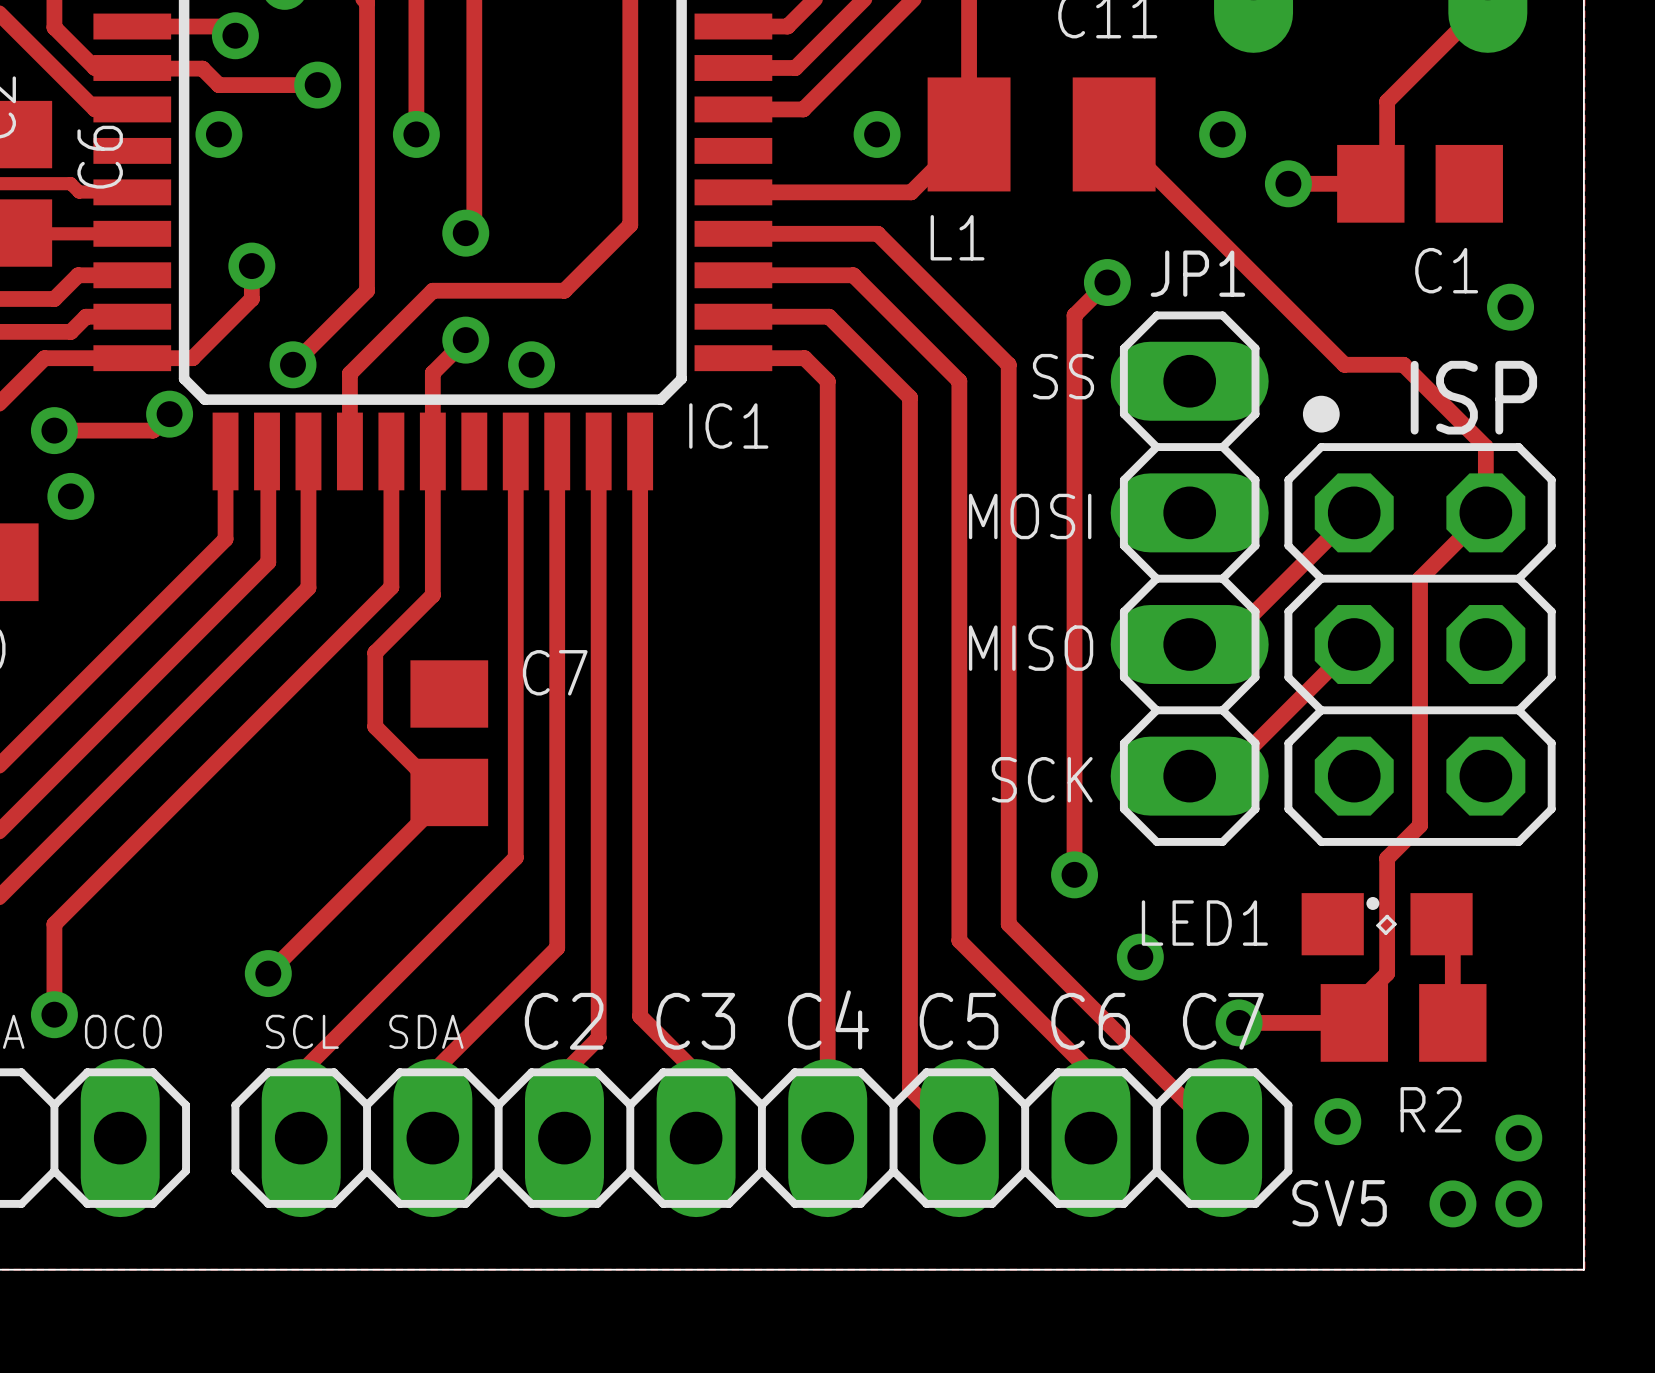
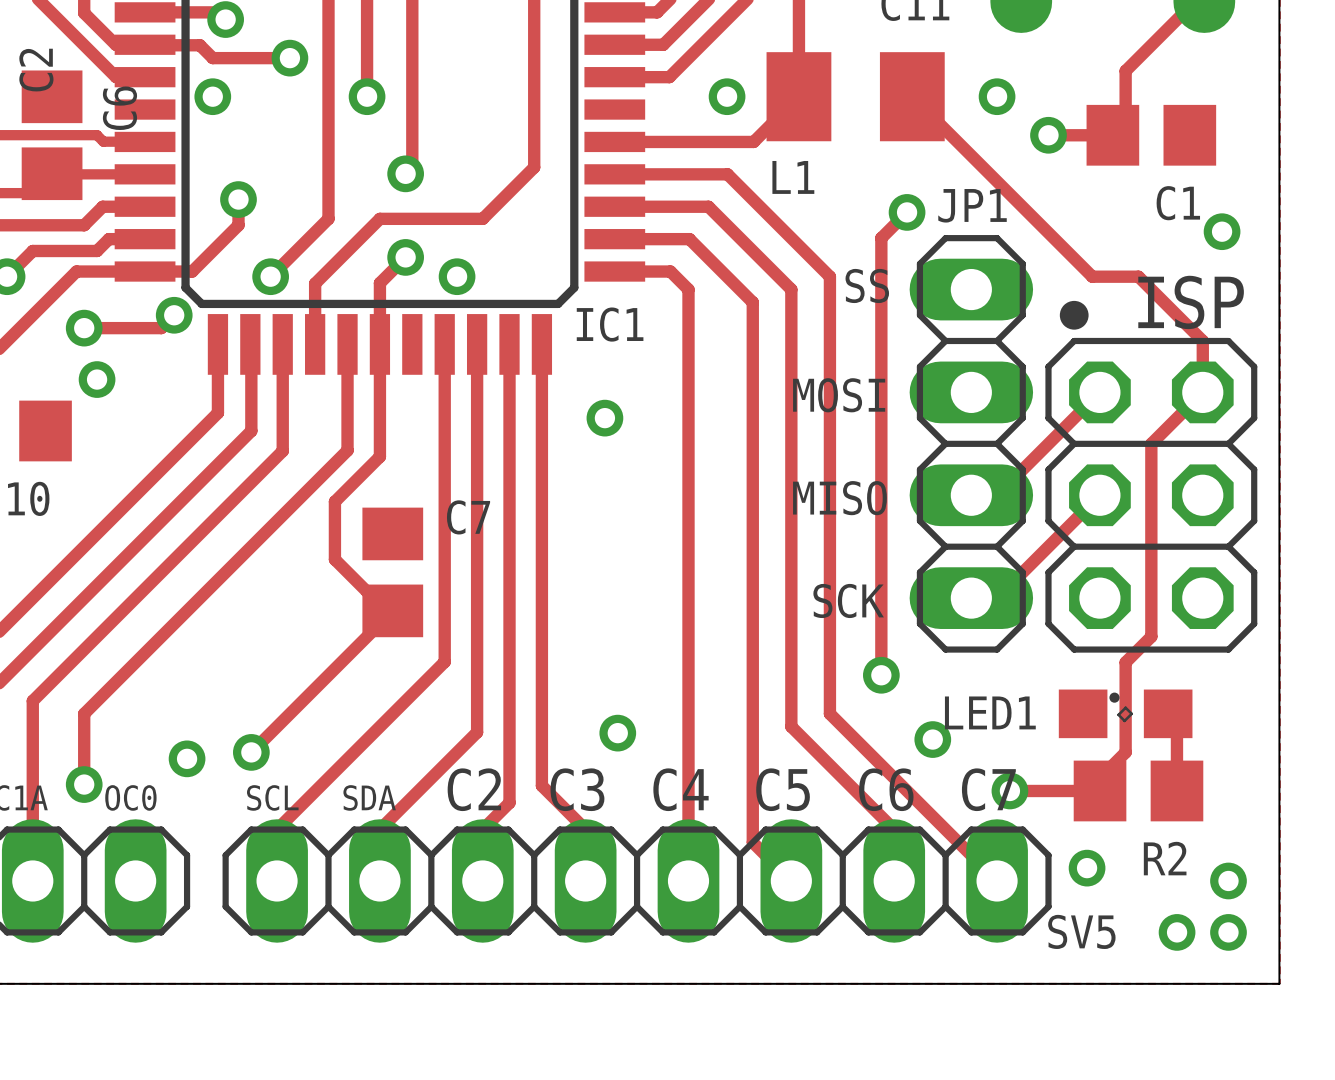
via: none -> (604, 418)
via: none -> (617, 733)
via: none -> (187, 758)

